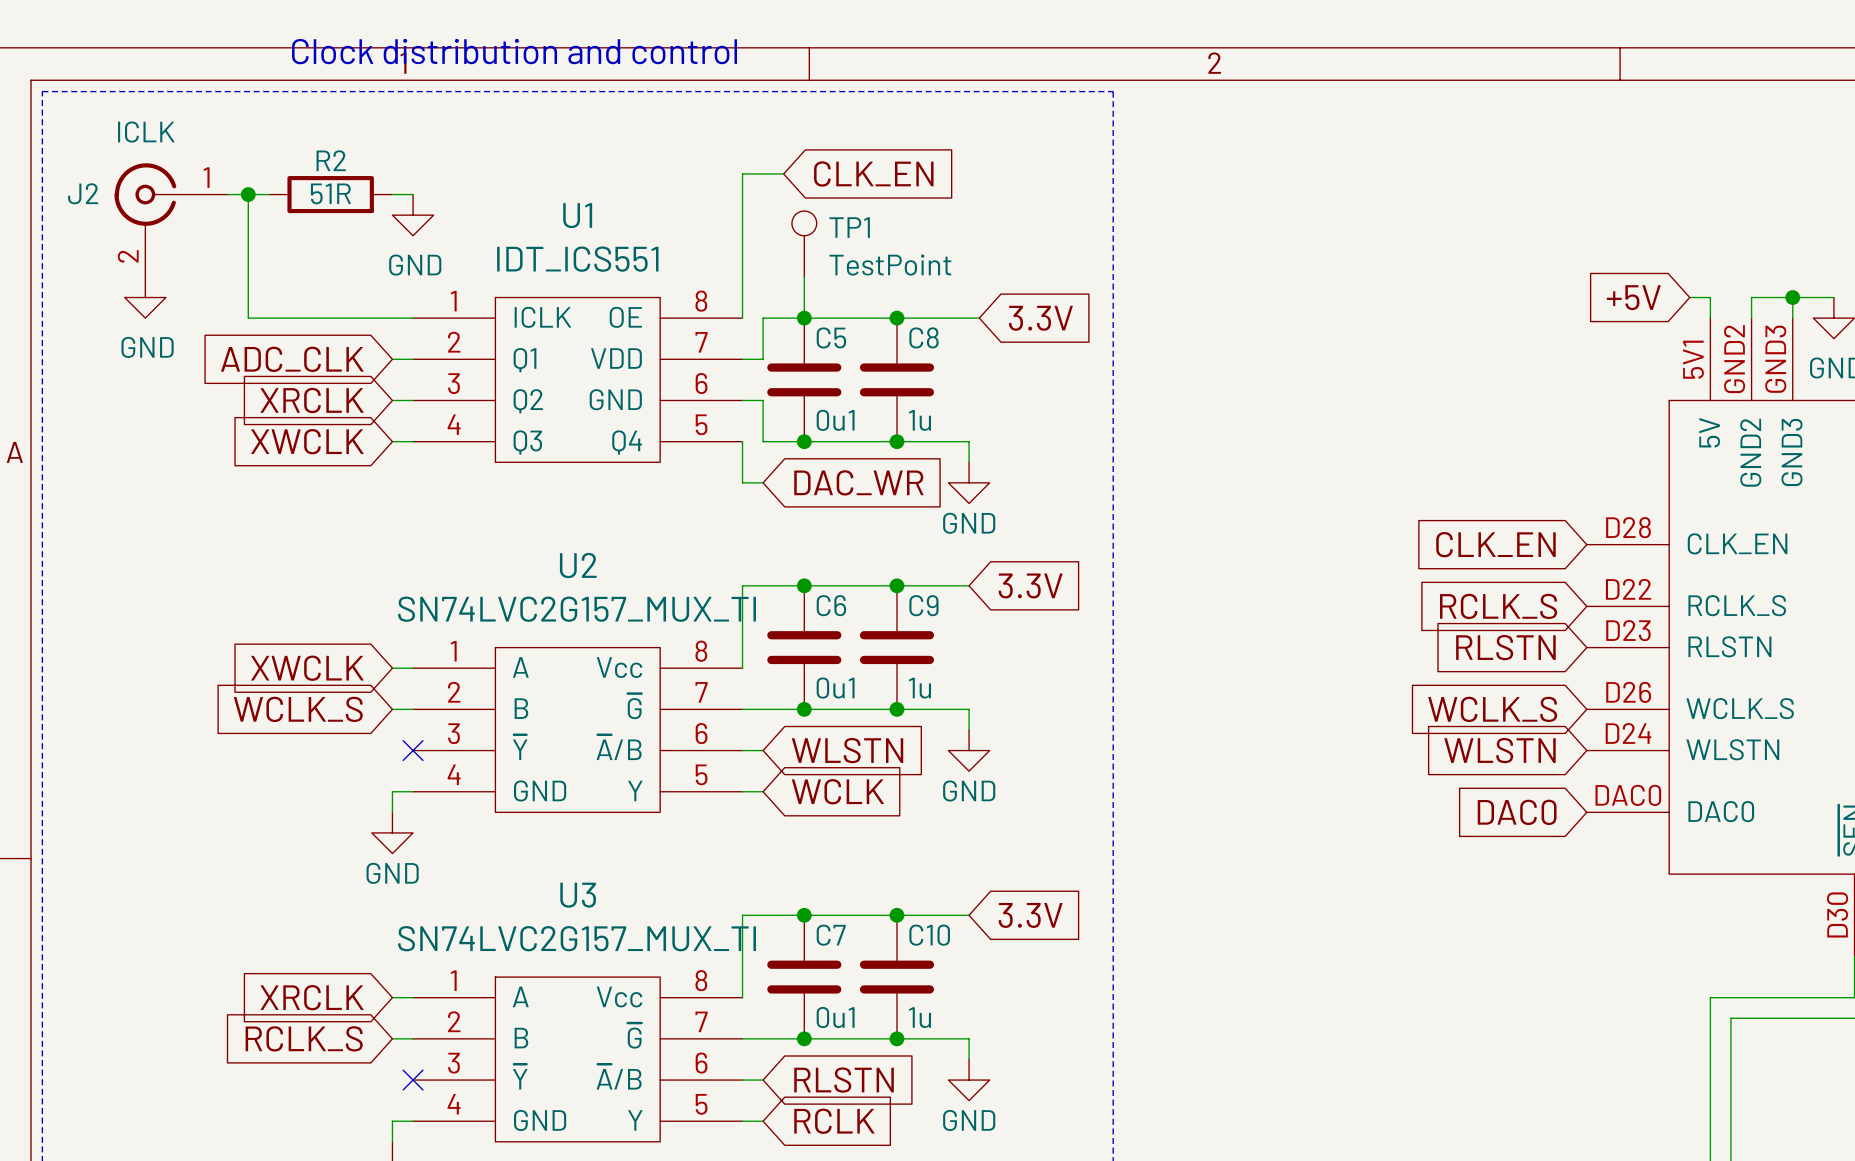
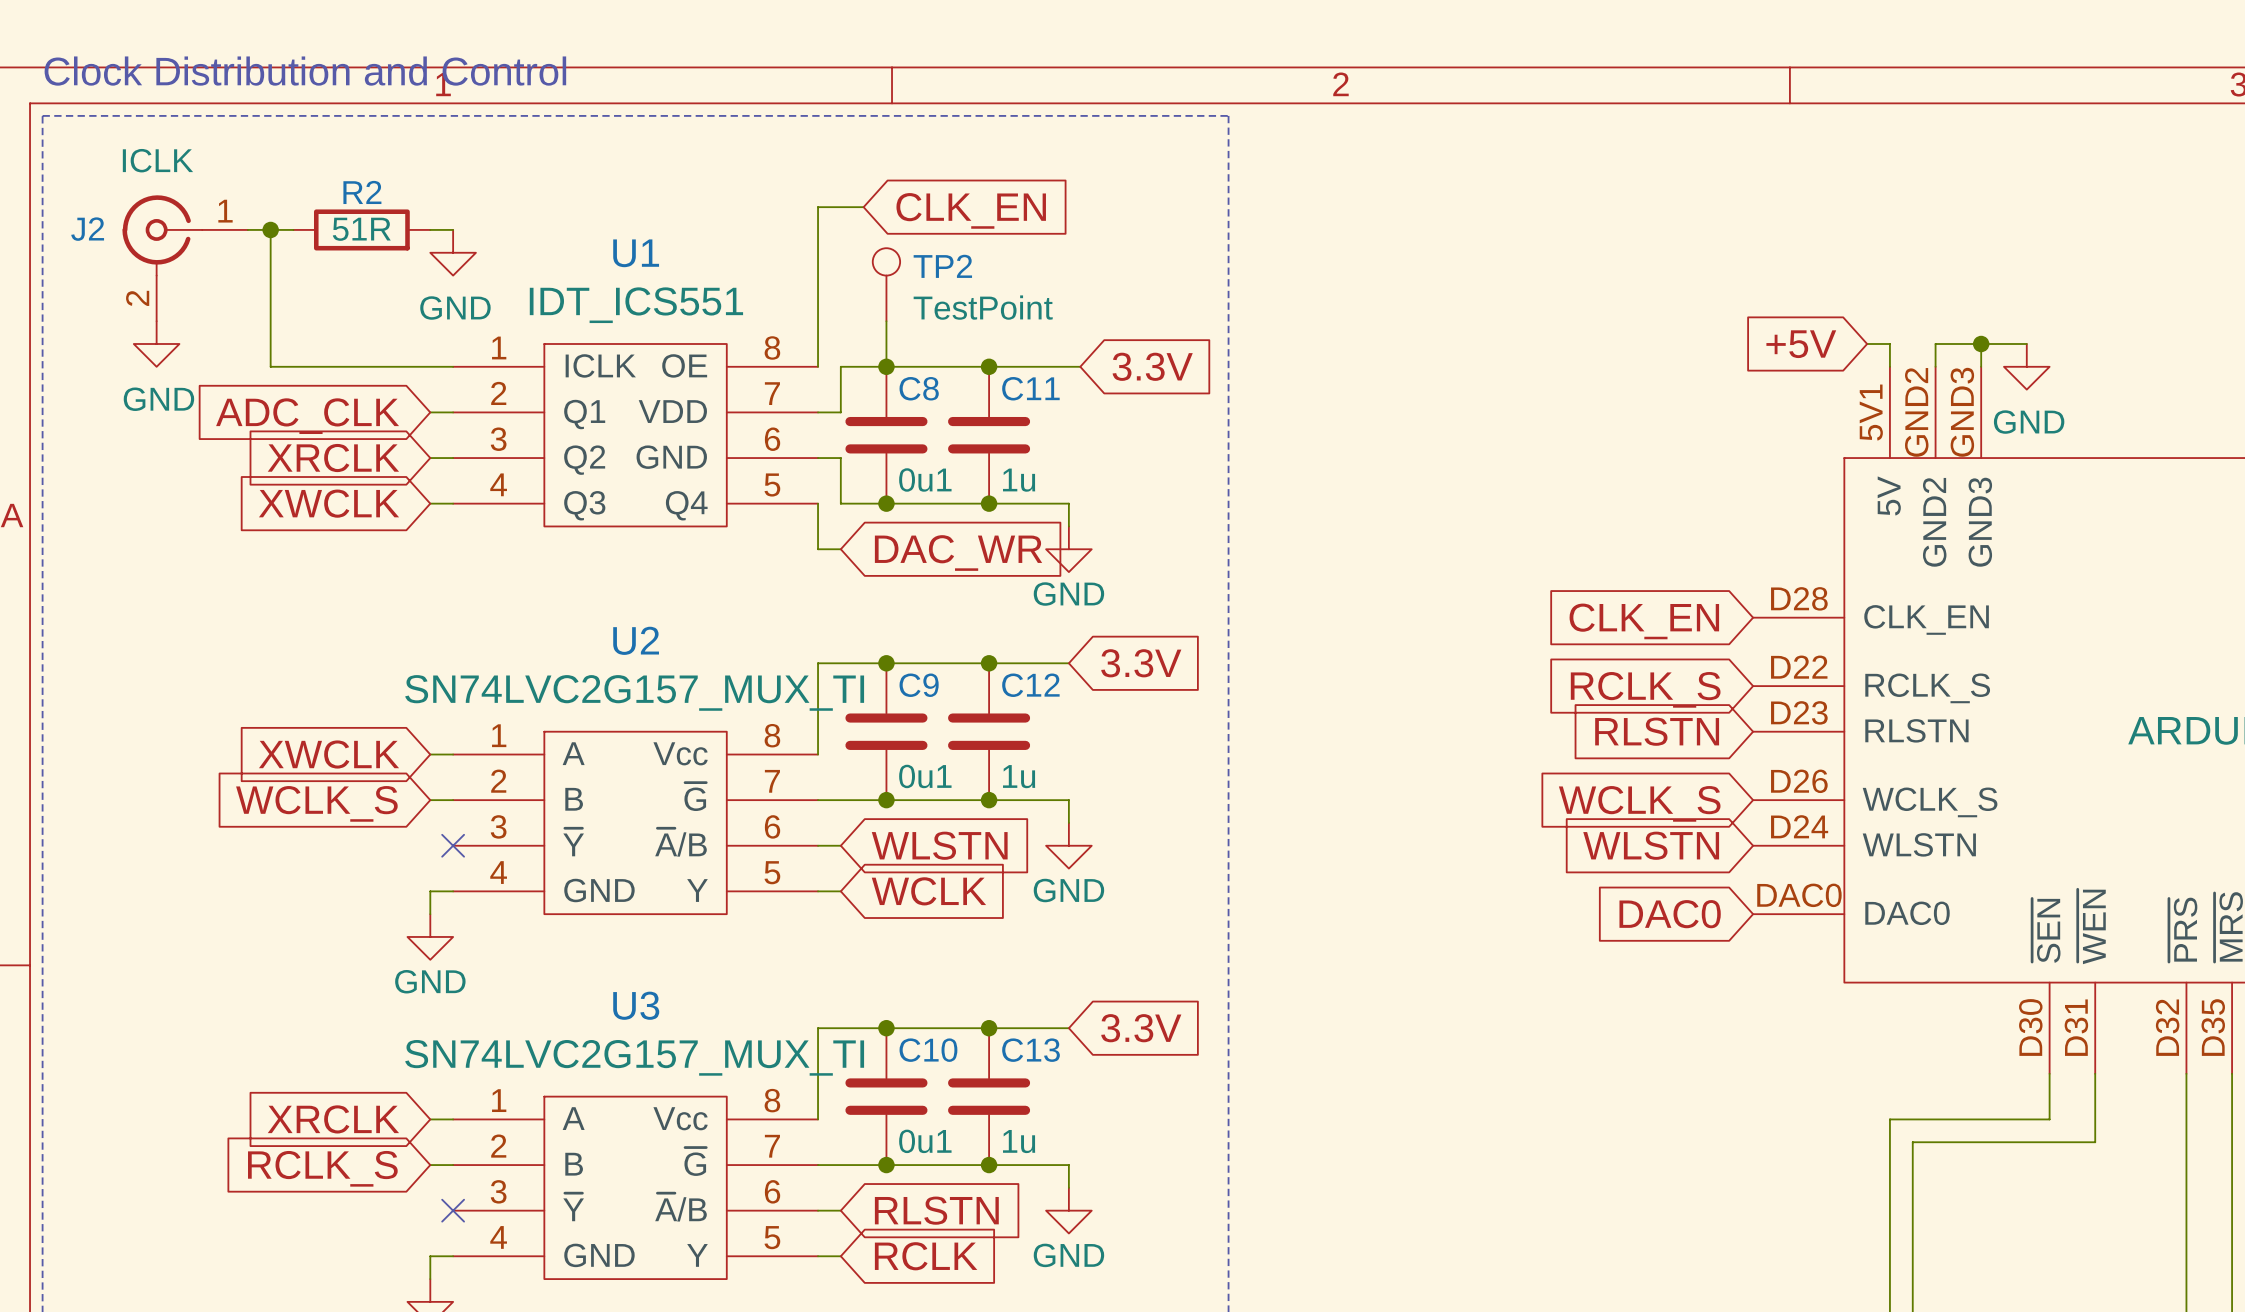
text: Clock distribution and control (514, 51) -> Clock Distribution and Control (305, 71)
TP1 name: TP1 (849, 227) -> TP2 (942, 266)
C5 name: C5 (831, 337) -> C8 (919, 388)
C8 name: C8 (924, 337) -> C11 (1030, 388)
C6 name: C6 (831, 605) -> C9 (919, 685)
C9 name: C9 (923, 605) -> C12 (1030, 685)
C7 name: C7 (831, 935) -> C10 (928, 1050)
C10 name: C10 (929, 935) -> C13 (1031, 1050)

